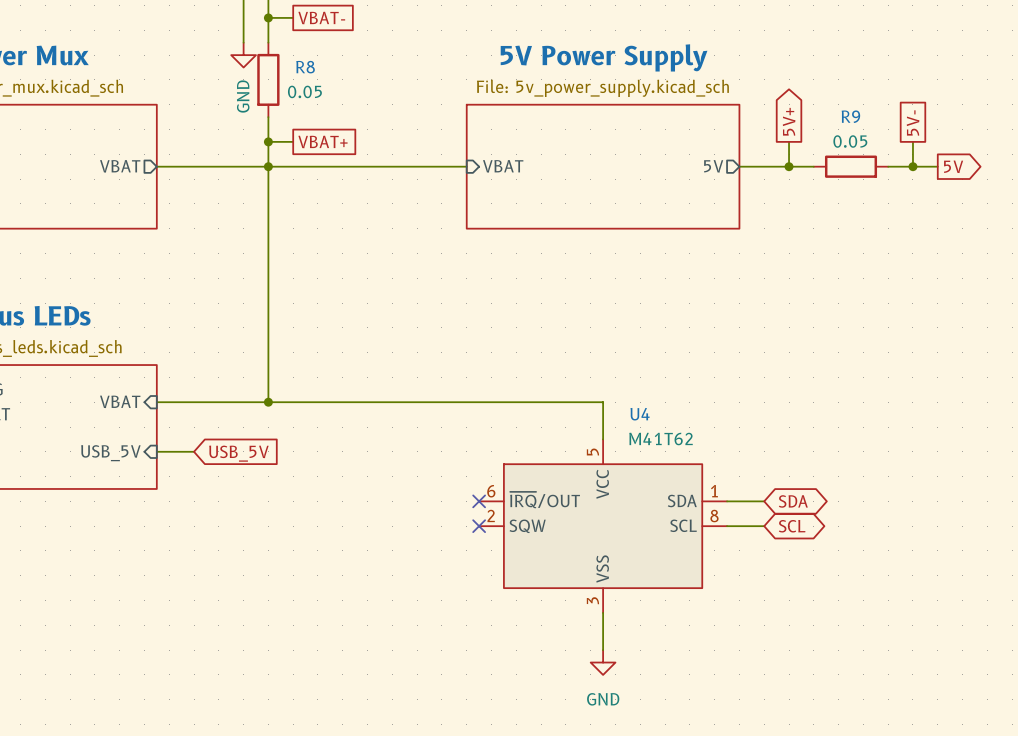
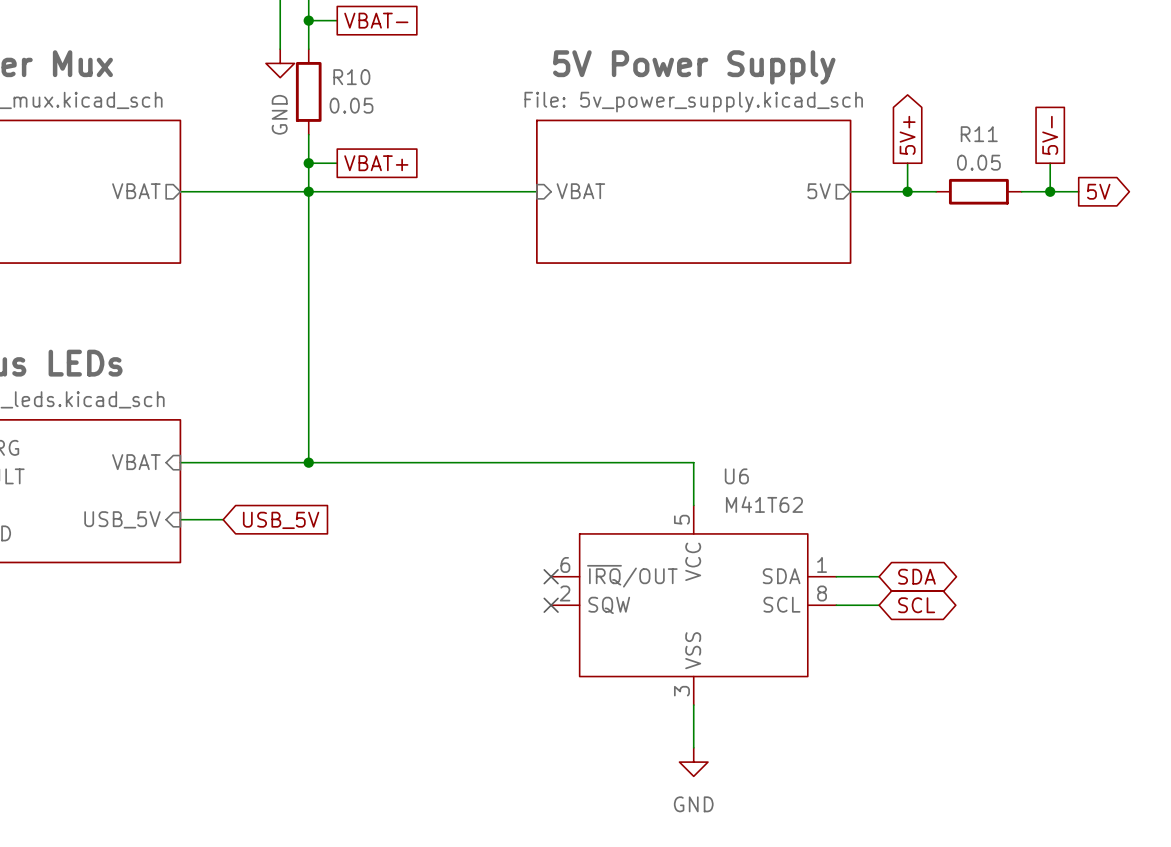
R8 name: R8 (305, 67) -> R10 (351, 77)
R9 name: R9 (850, 116) -> R11 (979, 134)
U4 name: U4 (640, 414) -> U6 (736, 476)

